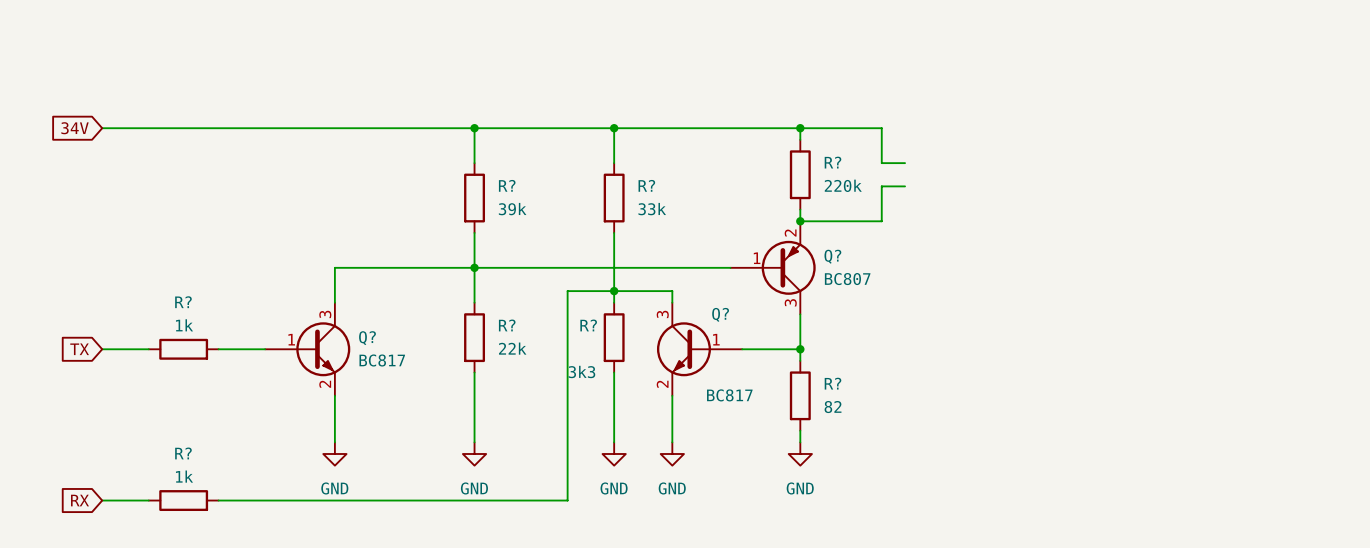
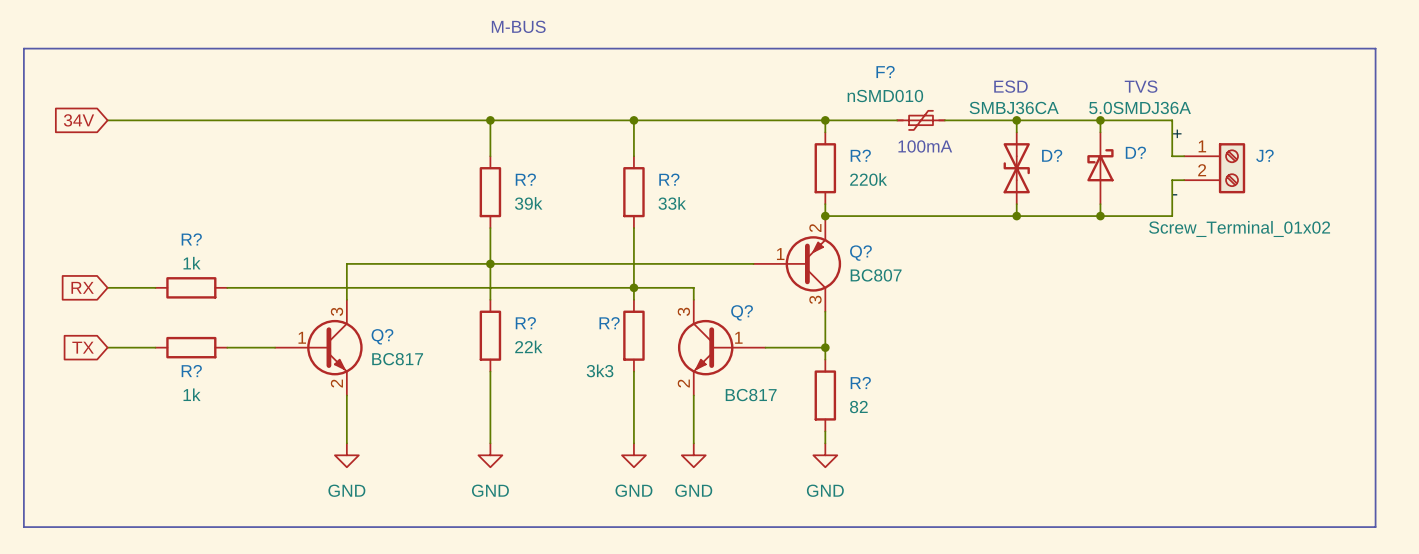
text: none -> M-BUS (518, 26)
line: none -> (23, 48) (1375, 48) (1375, 527) (23, 527) (23, 48)
text: none -> ESD (1010, 86)
text: none -> TVS (1141, 86)
wire: (870, 128) (881, 128) (881, 163) (905, 163) -> none
F?: none -> nSMD010 (921, 120)
wire: none -> (944, 120) (1172, 120) (1172, 156) (1184, 156)
wire: none -> (1016, 120) (1016, 132)
junction: none -> (1016, 120)
wire: none -> (1100, 120) (1100, 132)
junction: none -> (1100, 120)
label: none -> + (1177, 133)
text: none -> 100mA (925, 146)
D?: none -> SMBJ36CA (1016, 168)
D?: none -> 5.0SMDJ36A (1100, 168)
J?: none -> Screw_Terminal_01x02 (1214, 168)
wire: (905, 186) (881, 186) (881, 221) -> (1184, 180) (1172, 180) (1172, 216) (909, 216)
label: none -> - (1175, 194)
wire: none -> (1016, 204) (1016, 216)
wire: none -> (1100, 204) (1100, 216)
junction: none -> (1016, 216)
junction: none -> (1100, 216)
wire: (567, 291) (567, 500) (218, 500) -> (586, 287) (227, 287)
R? name position: R? (183, 302) -> R? (191, 371)
R? value position: 1k (184, 325) -> 1k (192, 394)
global label position: RX (80, 500) -> RX (82, 287)
wire: (102, 500) (148, 500) -> (107, 287) (155, 287)
R? position: (183, 500) -> (191, 287)

